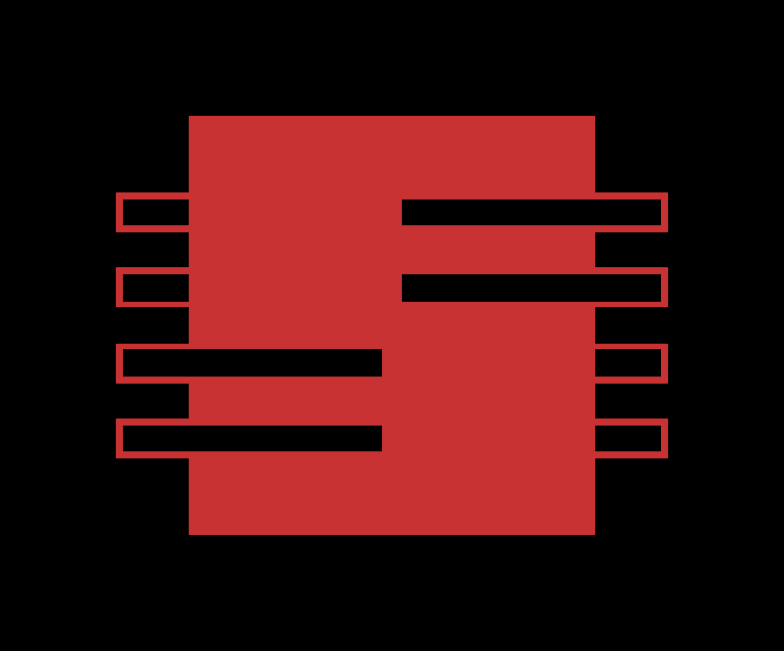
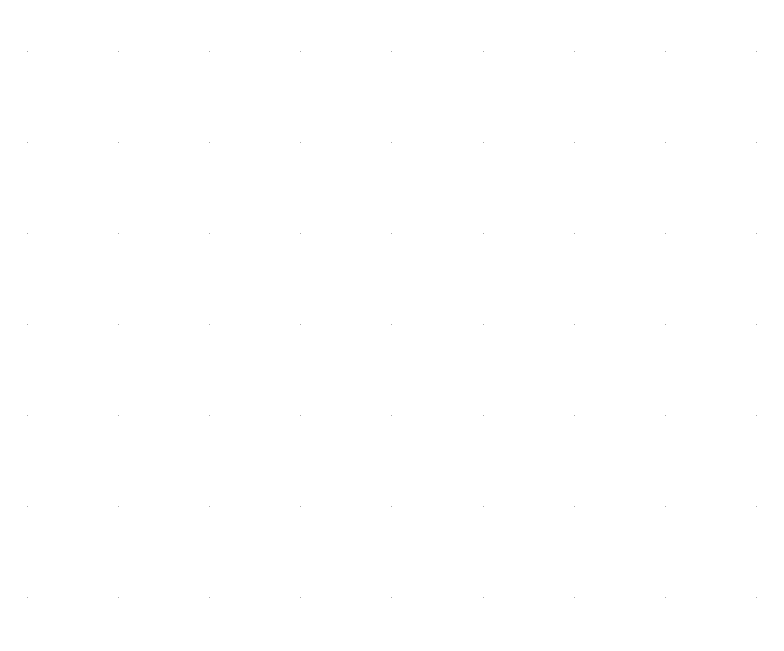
power symbol: (391, 325) -> none

